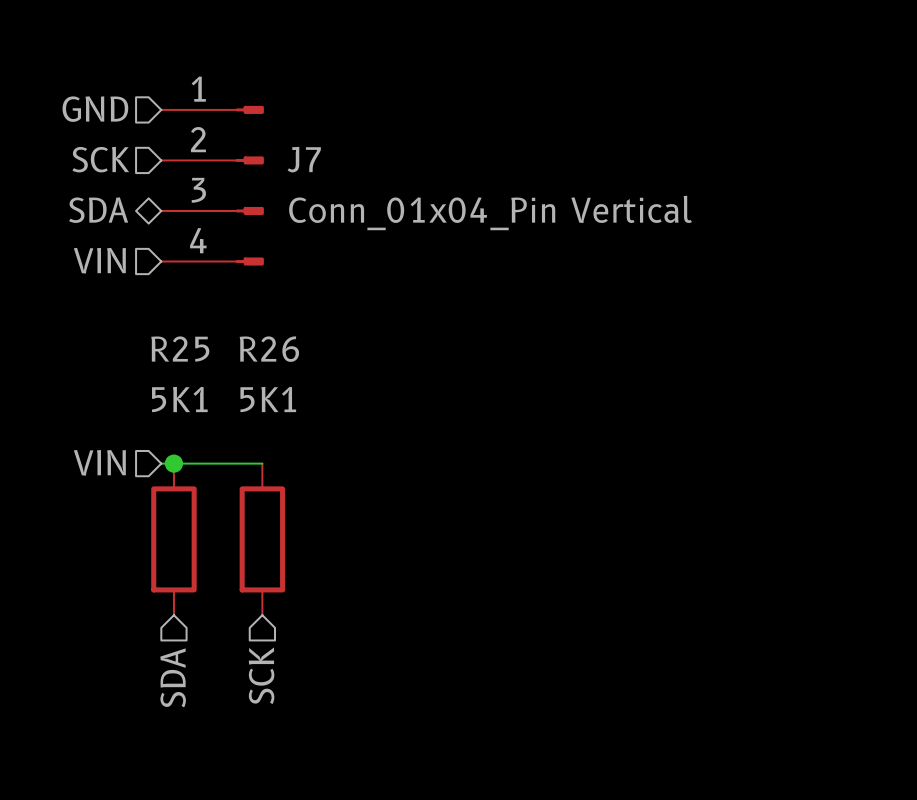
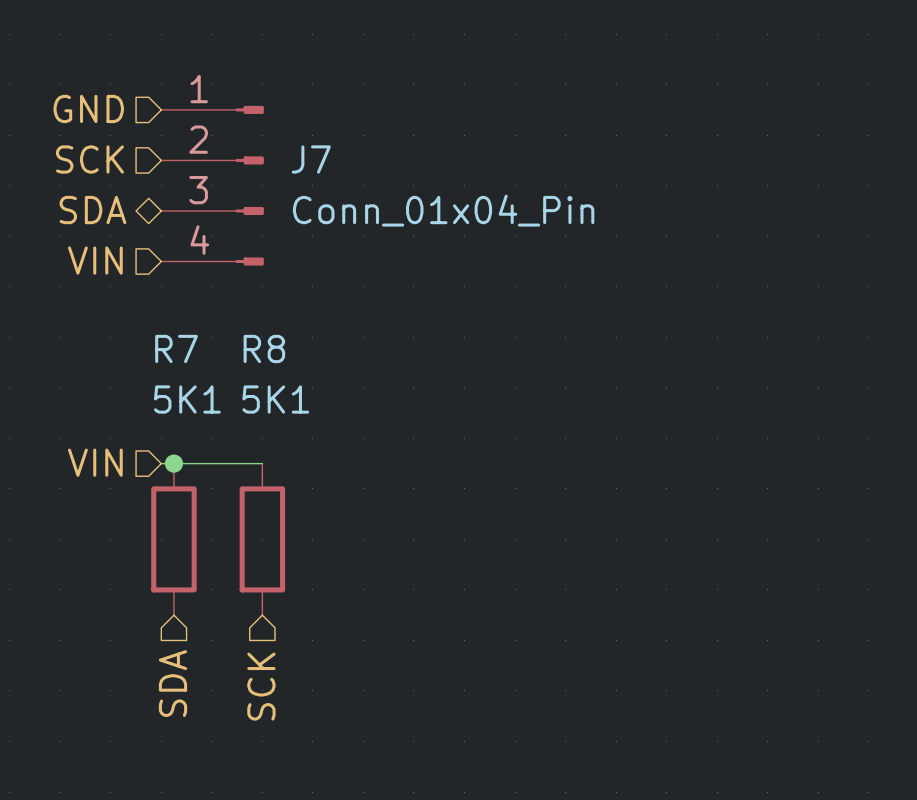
J7 value: Conn_01x04_Pin Vertical (490, 212) -> Conn_01x04_Pin (443, 210)
R25 name: R25 (180, 349) -> R7 (176, 348)
R26 name: R26 (269, 349) -> R8 (264, 348)

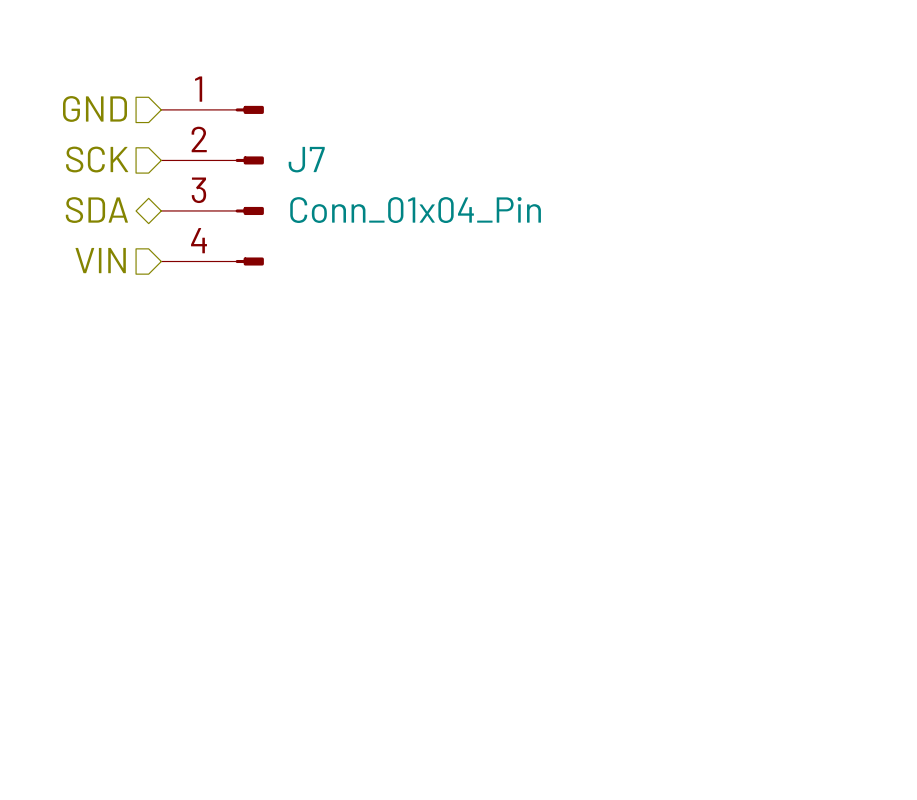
hierarchical label: VIN (95, 462) -> none
wire: (161, 463) (262, 463) -> none
junction: (173, 463) -> none
R7: 5K1 (173, 539) -> none
R8: 5K1 (262, 539) -> none
hierarchical label: SDA (173, 683) -> none
hierarchical label: SCK (261, 686) -> none

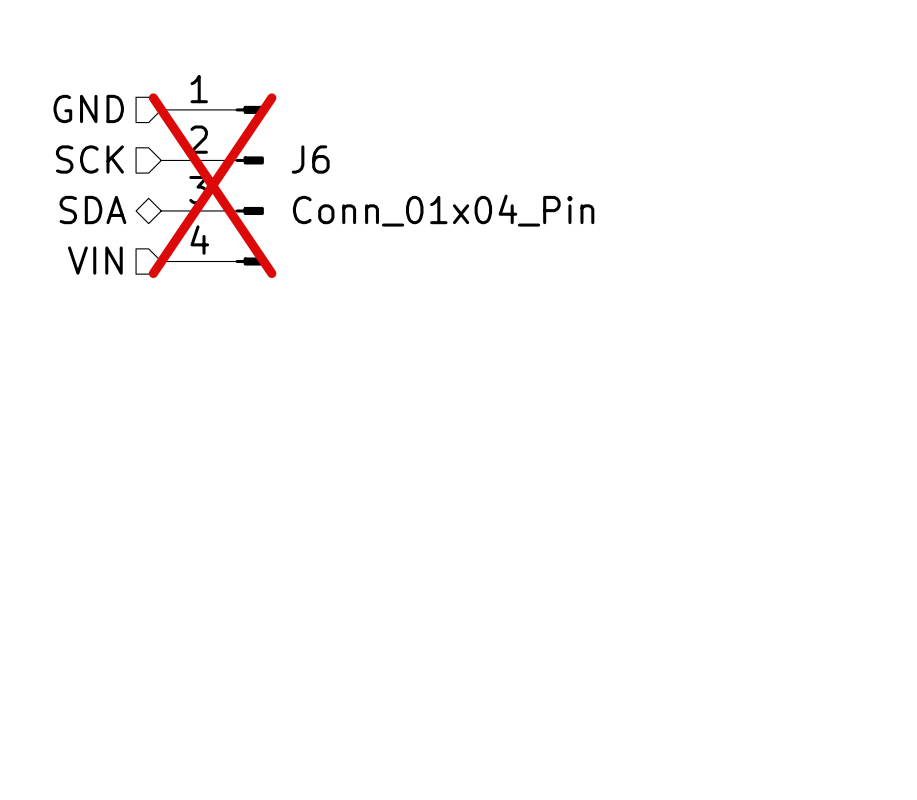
J7 name: J7 (306, 159) -> J6 (310, 159)
J7 do-not-place cross: none -> (212, 185)

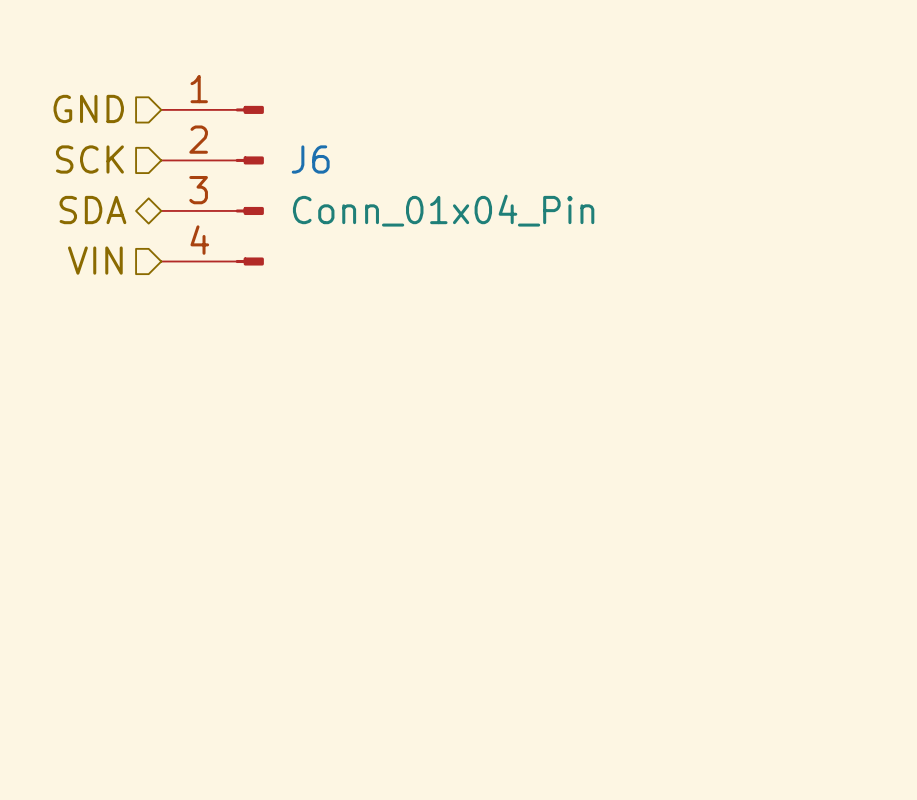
J6 do-not-place cross: (212, 185) -> none

